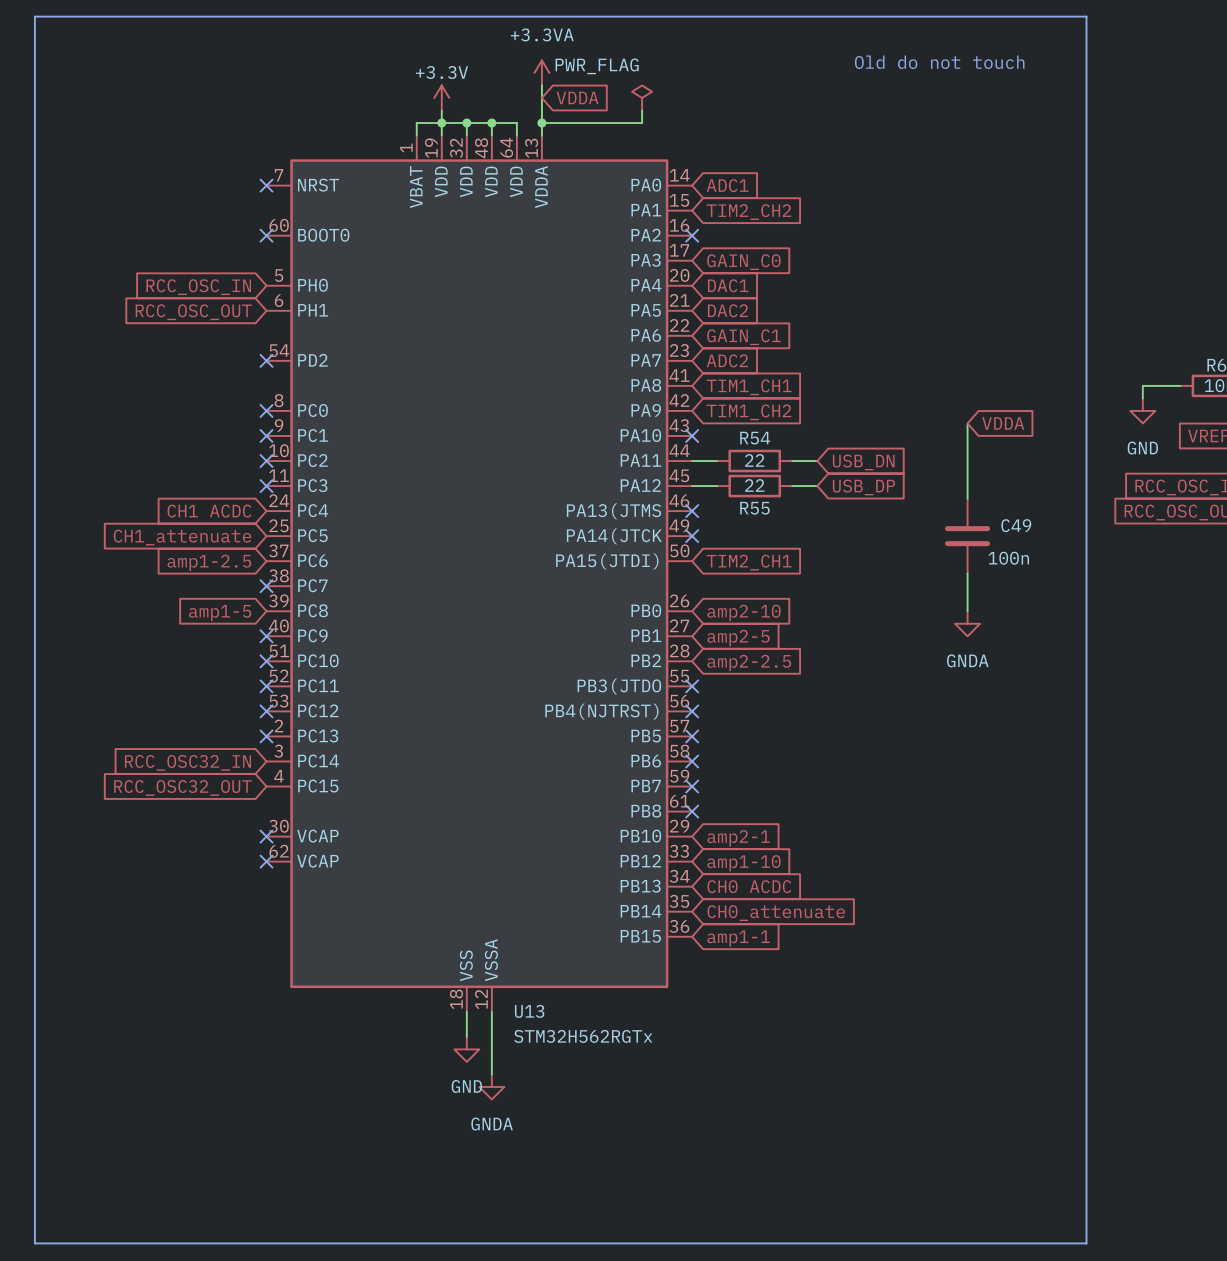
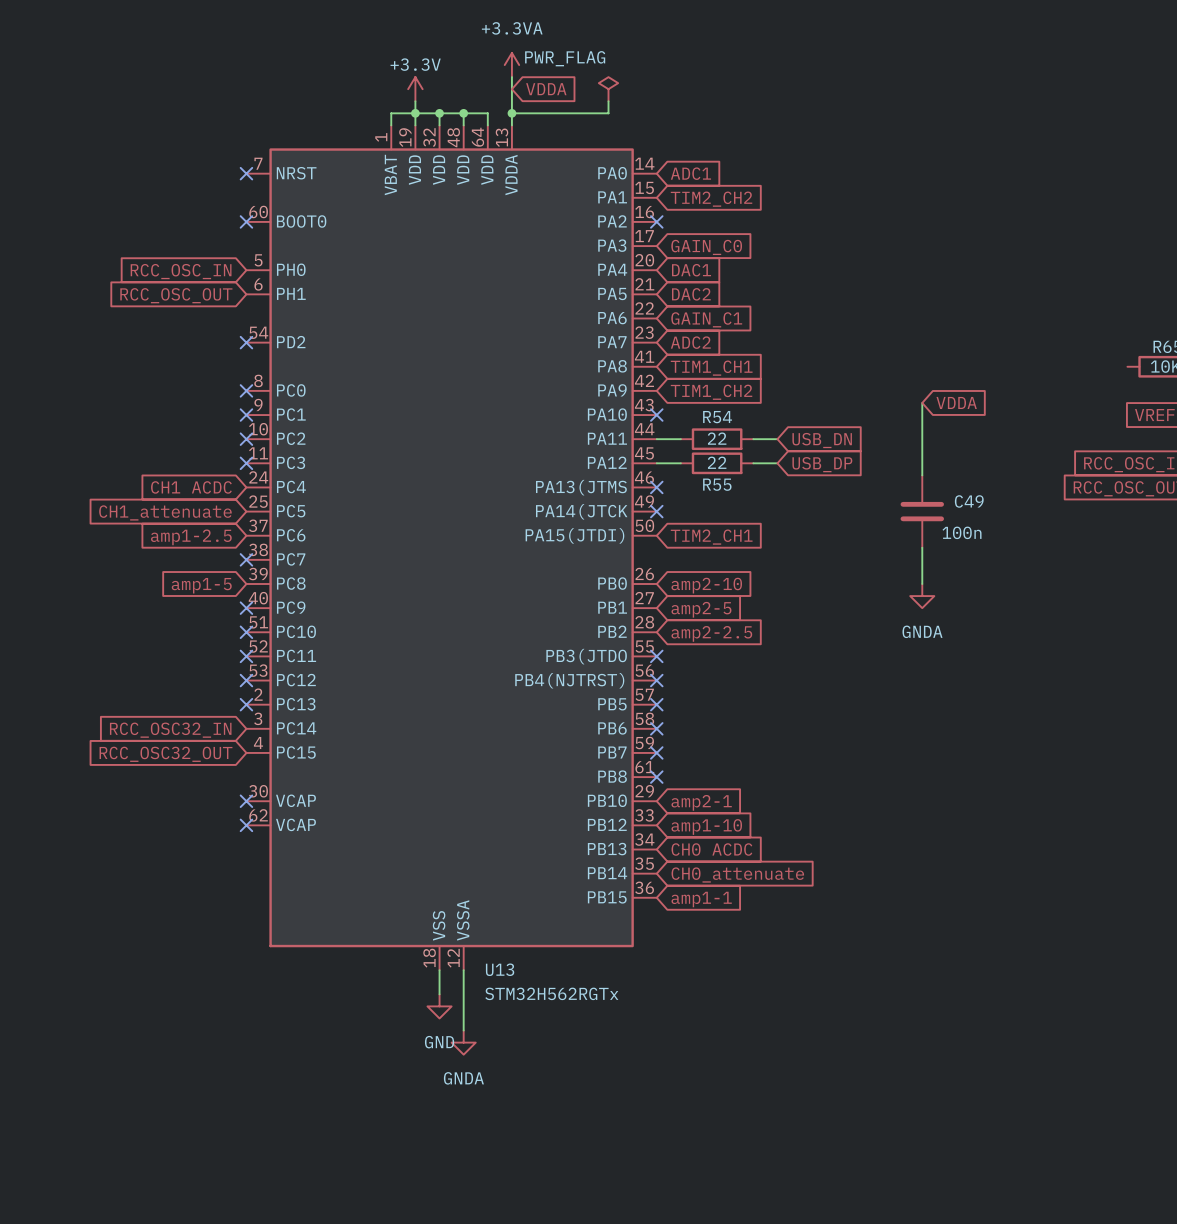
line: (34, 16) (1086, 16) (1086, 1243) (34, 1243) (34, 16) -> none
text: Old do not touch (939, 62) -> none
wire: (1180, 385) (1142, 385) (1142, 398) -> none
power symbol: GND (1142, 410) -> none

